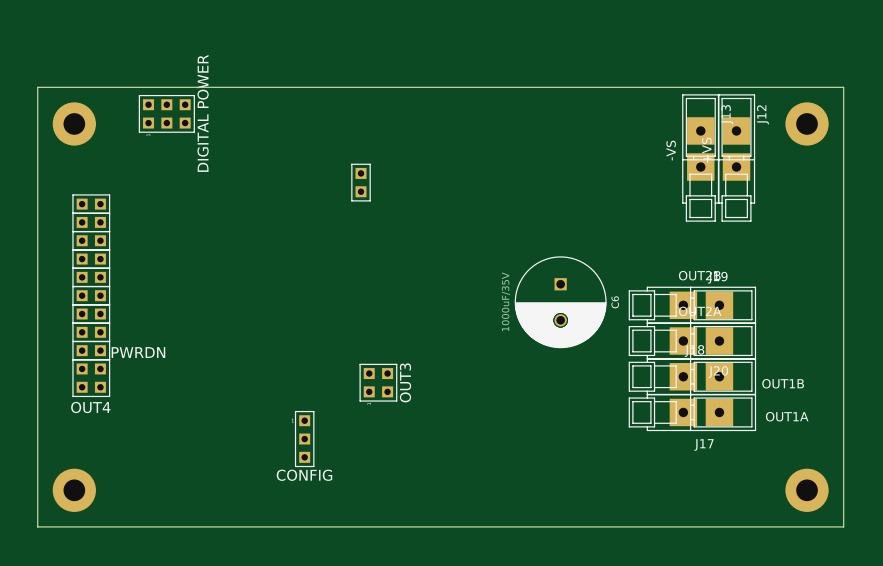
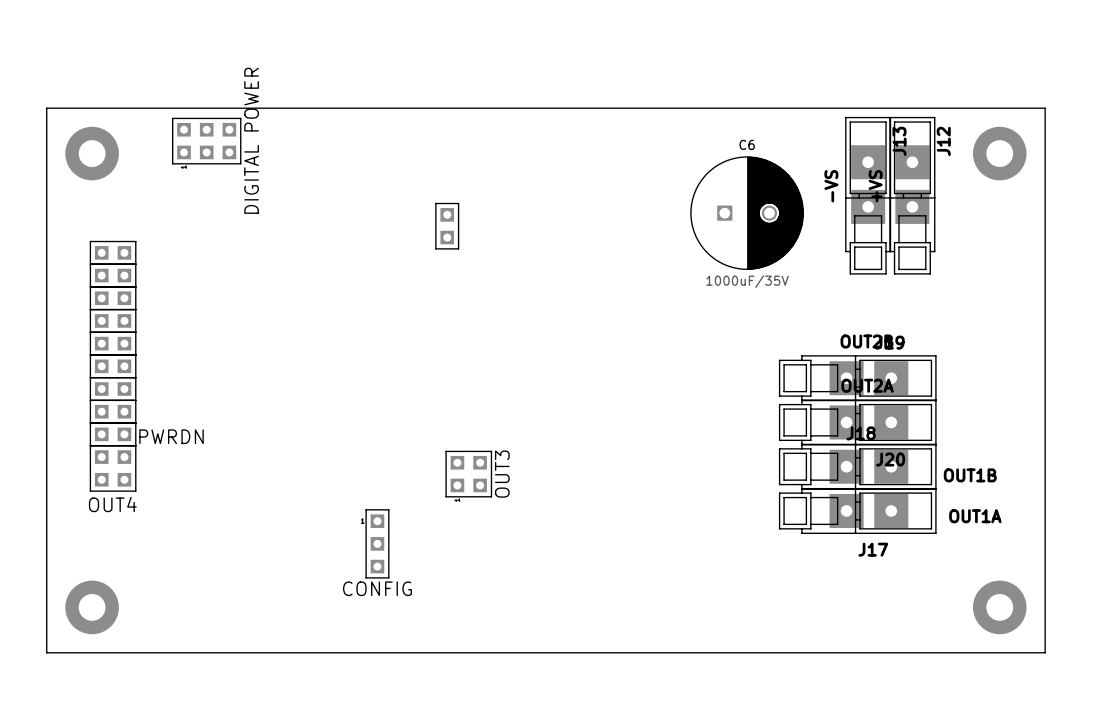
C6 rotation: 0° (560, 302) -> 90° counterclockwise (747, 213)
C6 position: (560, 302) -> (747, 213)

